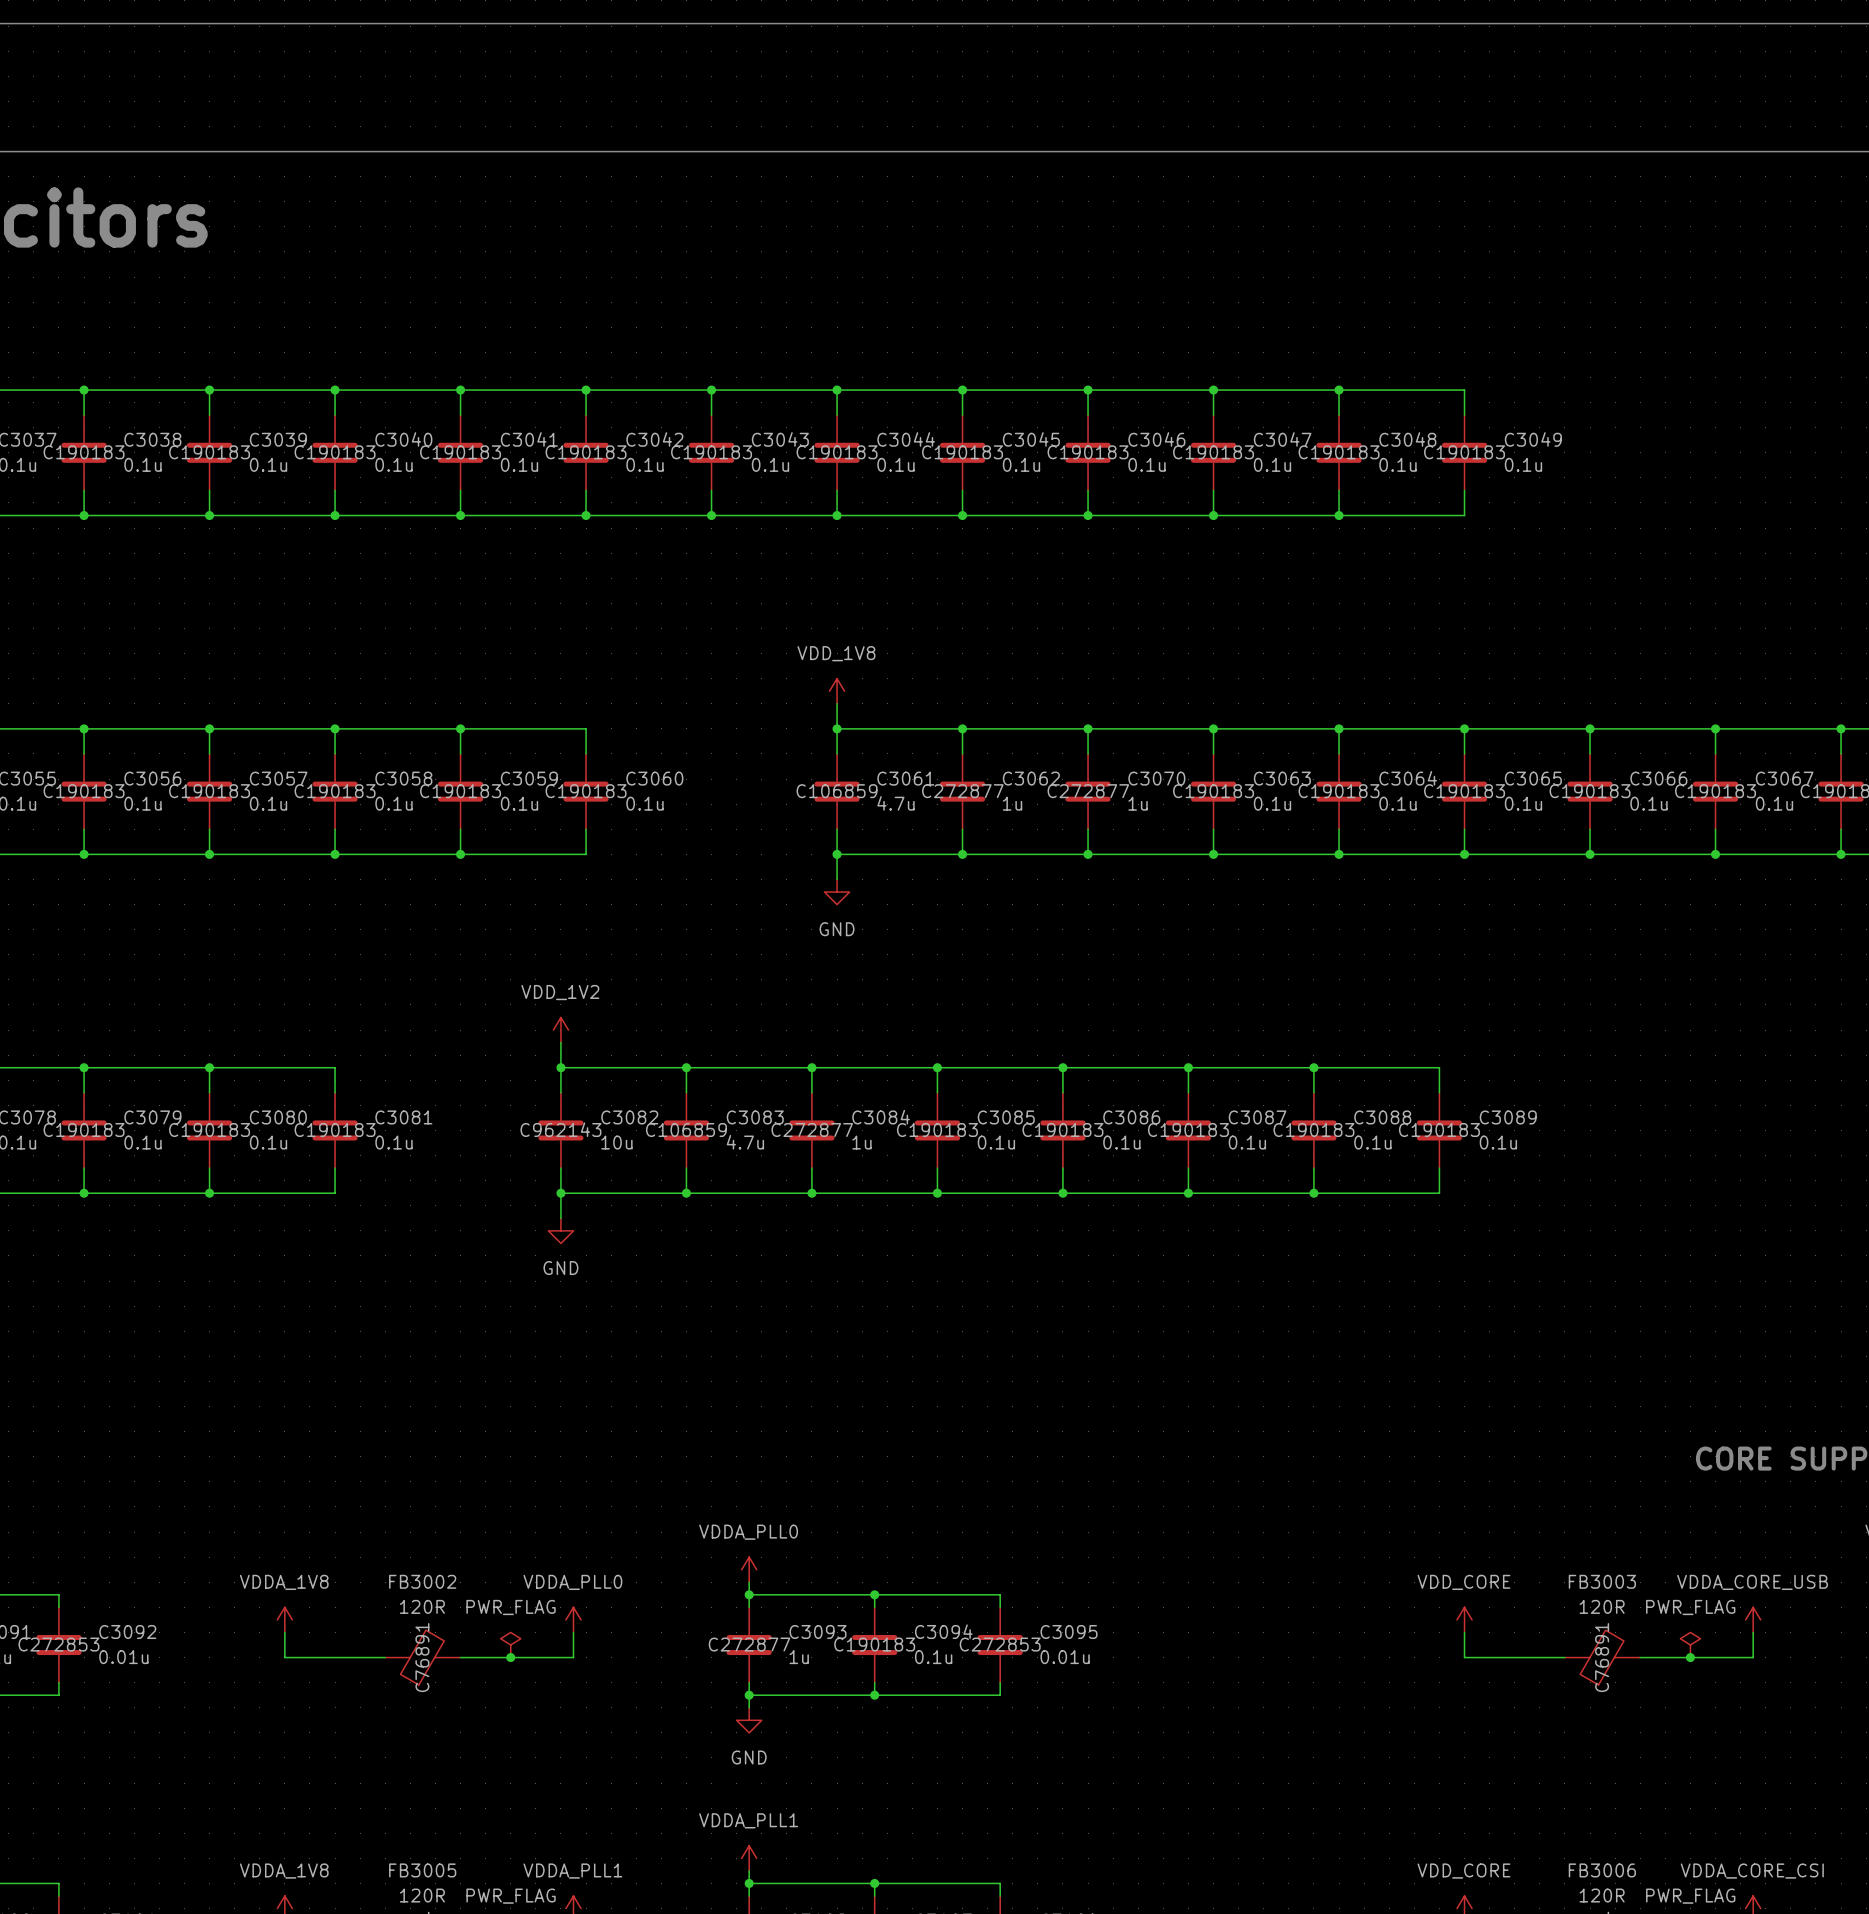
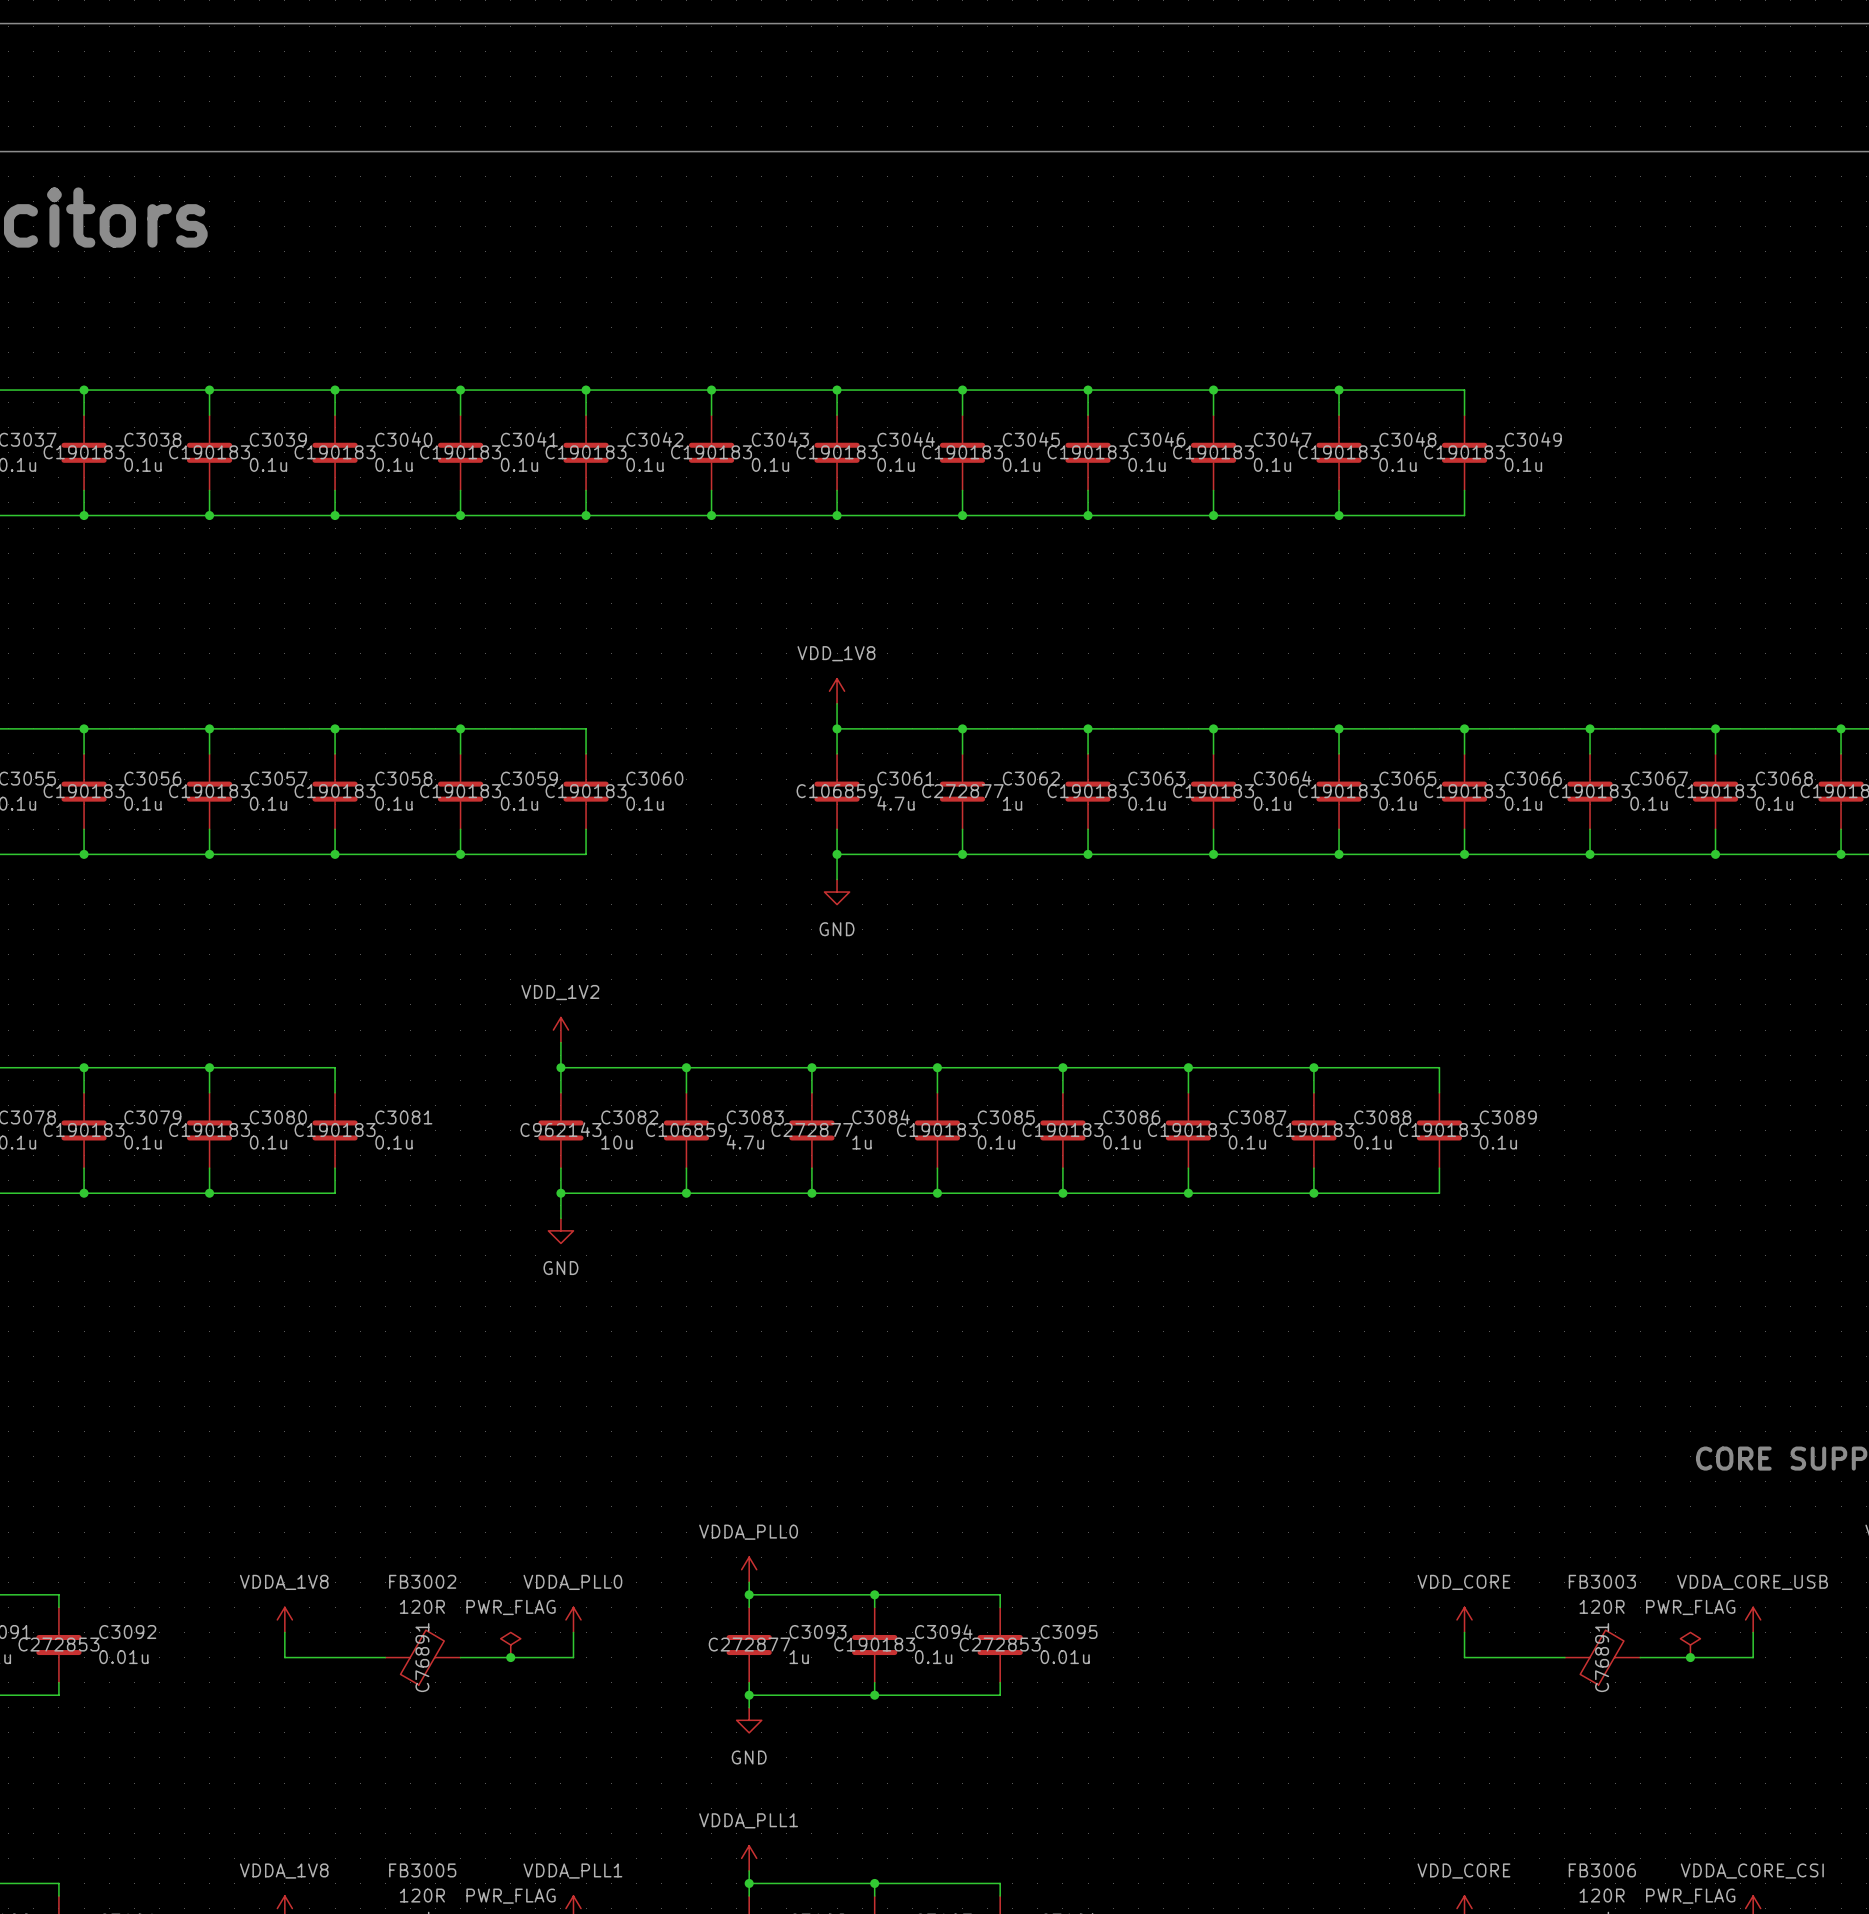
C3070 name: C3070 (1156, 778) -> C3063 (1156, 778)
C3063 name: C3063 (1282, 778) -> C3064 (1282, 778)
C3064 name: C3064 (1408, 778) -> C3065 (1407, 778)
C3065 name: C3065 (1533, 778) -> C3066 (1533, 778)
C3066 name: C3066 (1658, 778) -> C3067 (1659, 778)
C3067 name: C3067 (1784, 778) -> C3068 (1784, 778)
C3070 text: C272877 (1088, 791) -> C190183 (1088, 791)
C3070 value: 1u (1138, 803) -> 0.1u (1146, 803)

